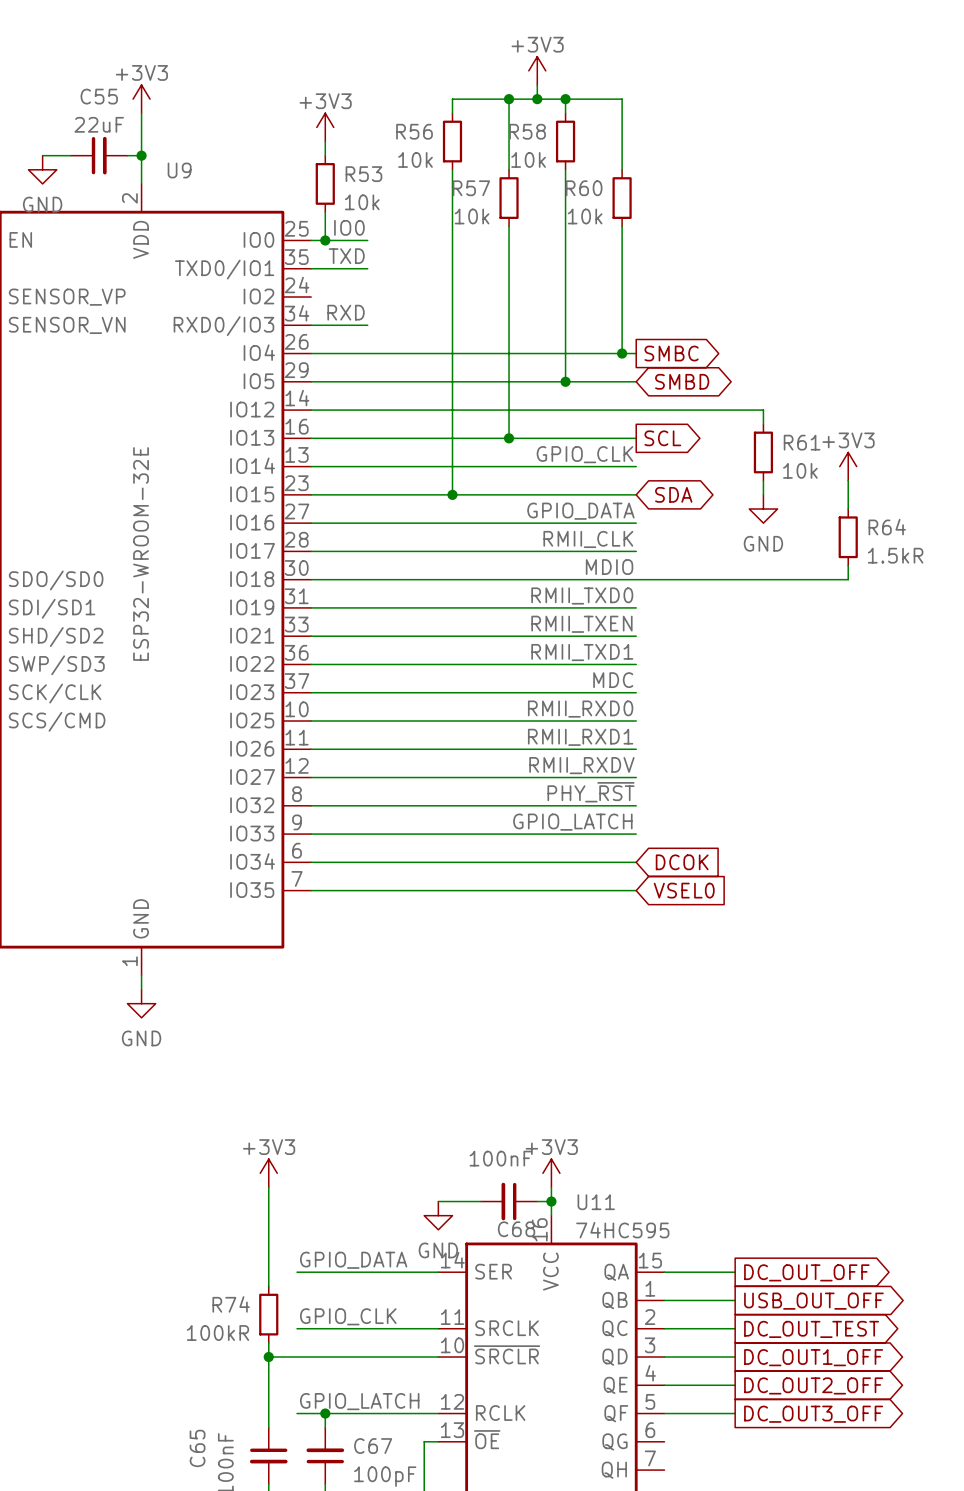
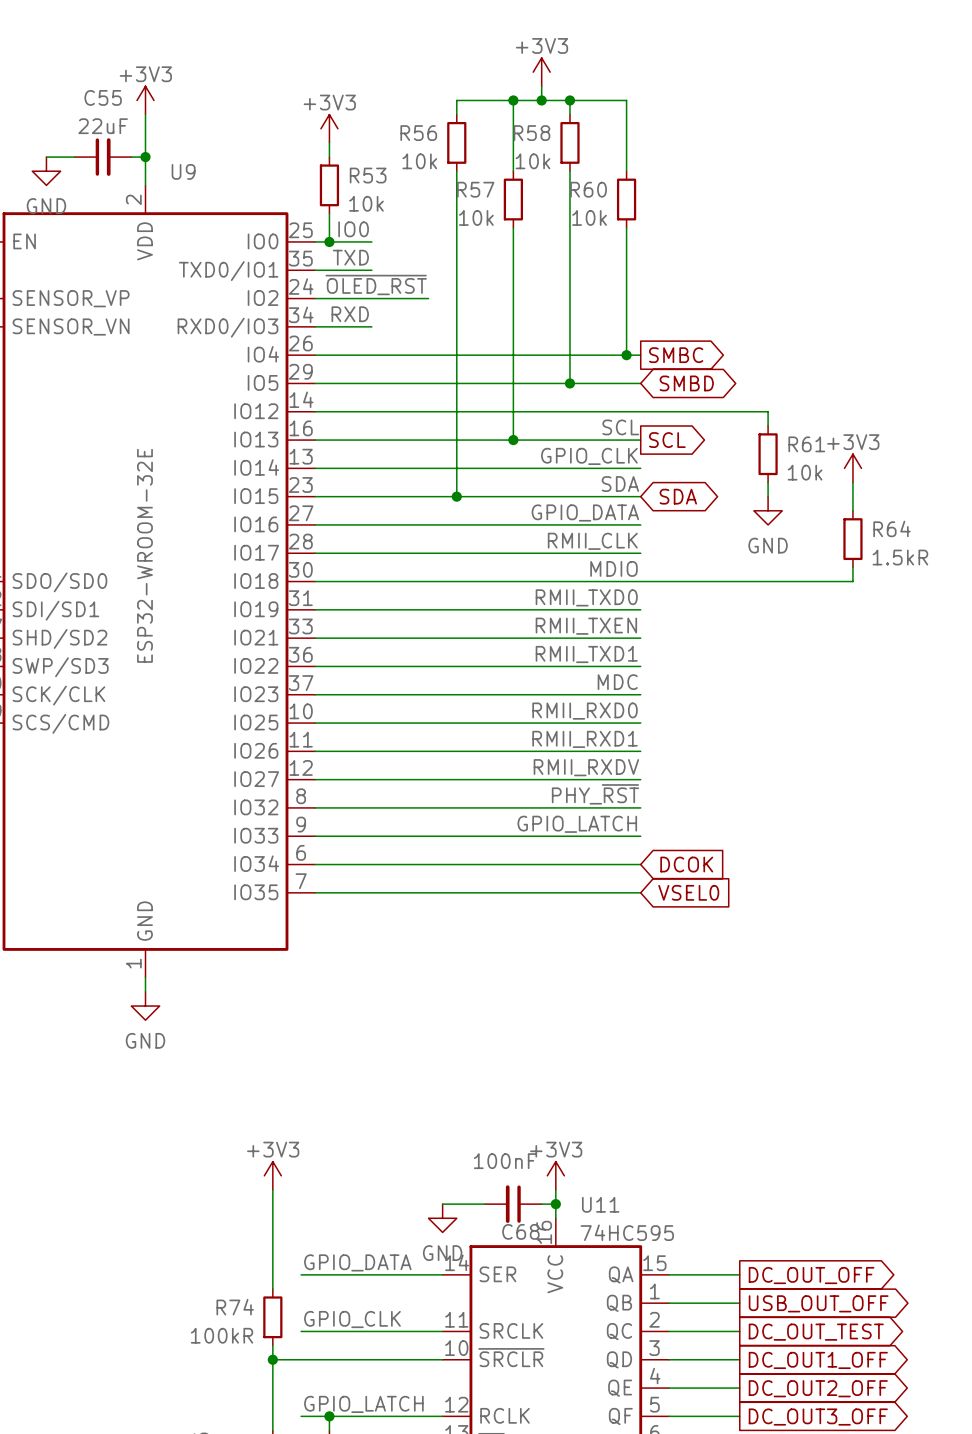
label: none -> ~{OLED_RST} (376, 284)
wire: none -> (315, 298) (428, 298)
label: none -> SCL (620, 427)
label: none -> SDA (620, 484)

